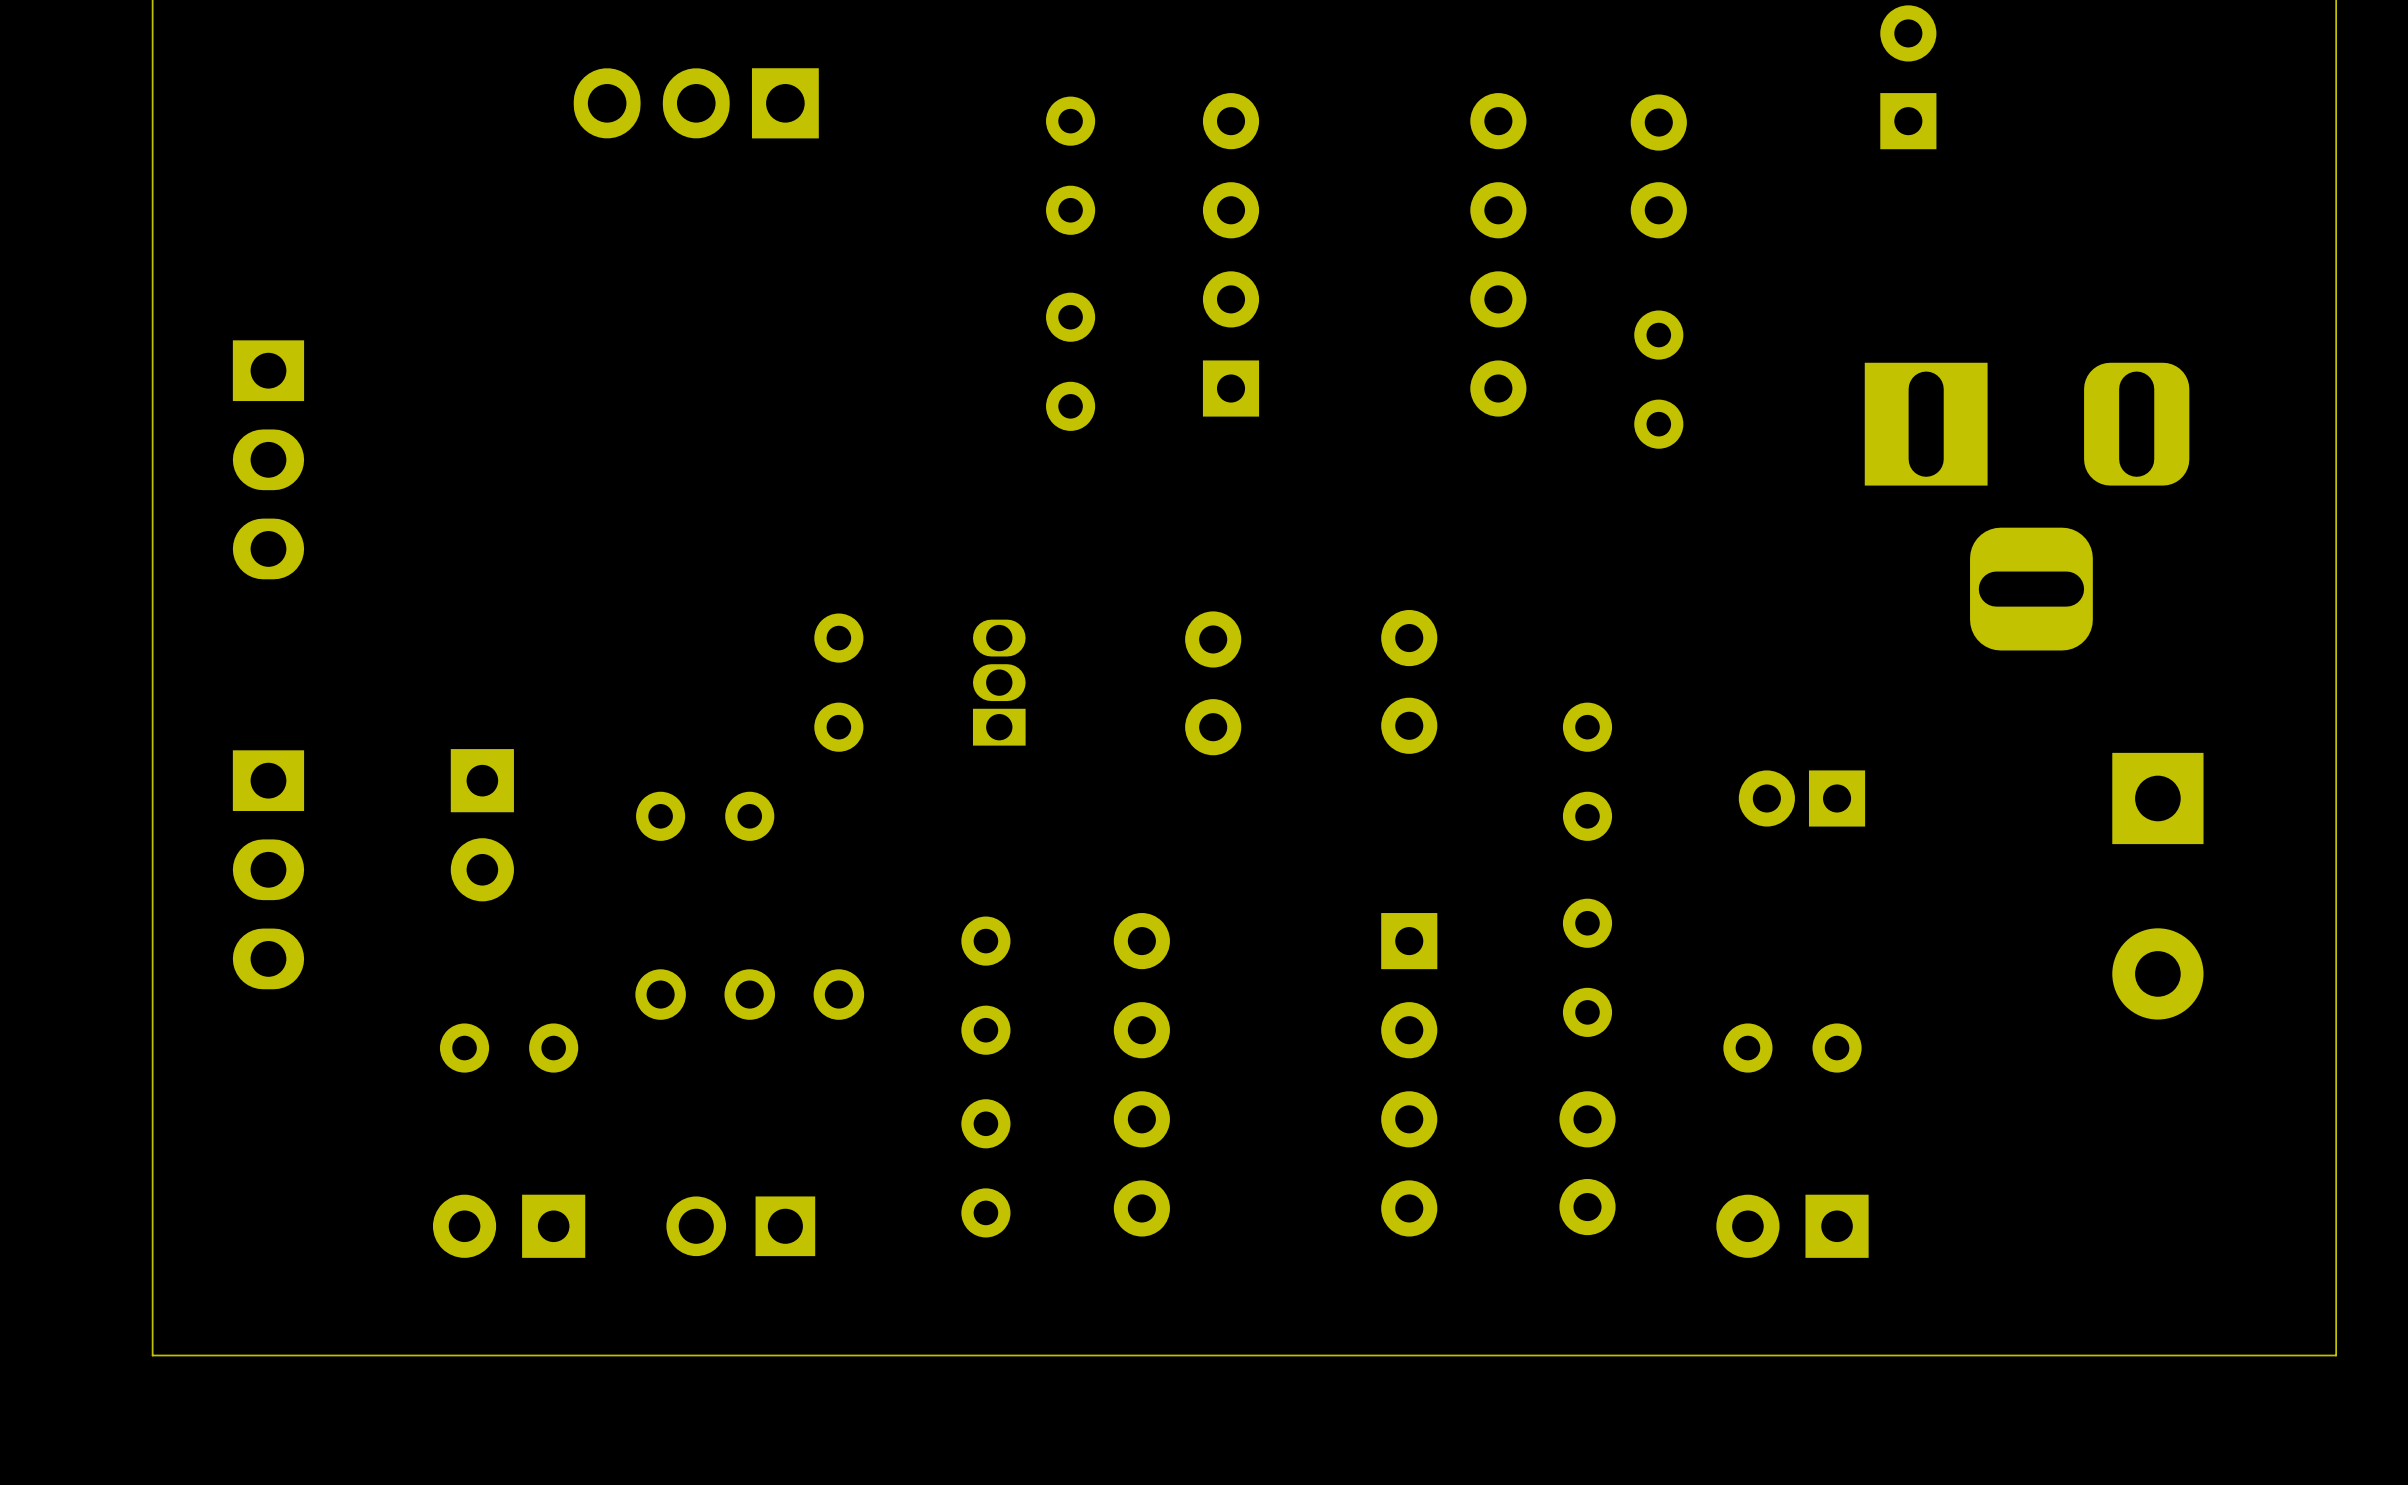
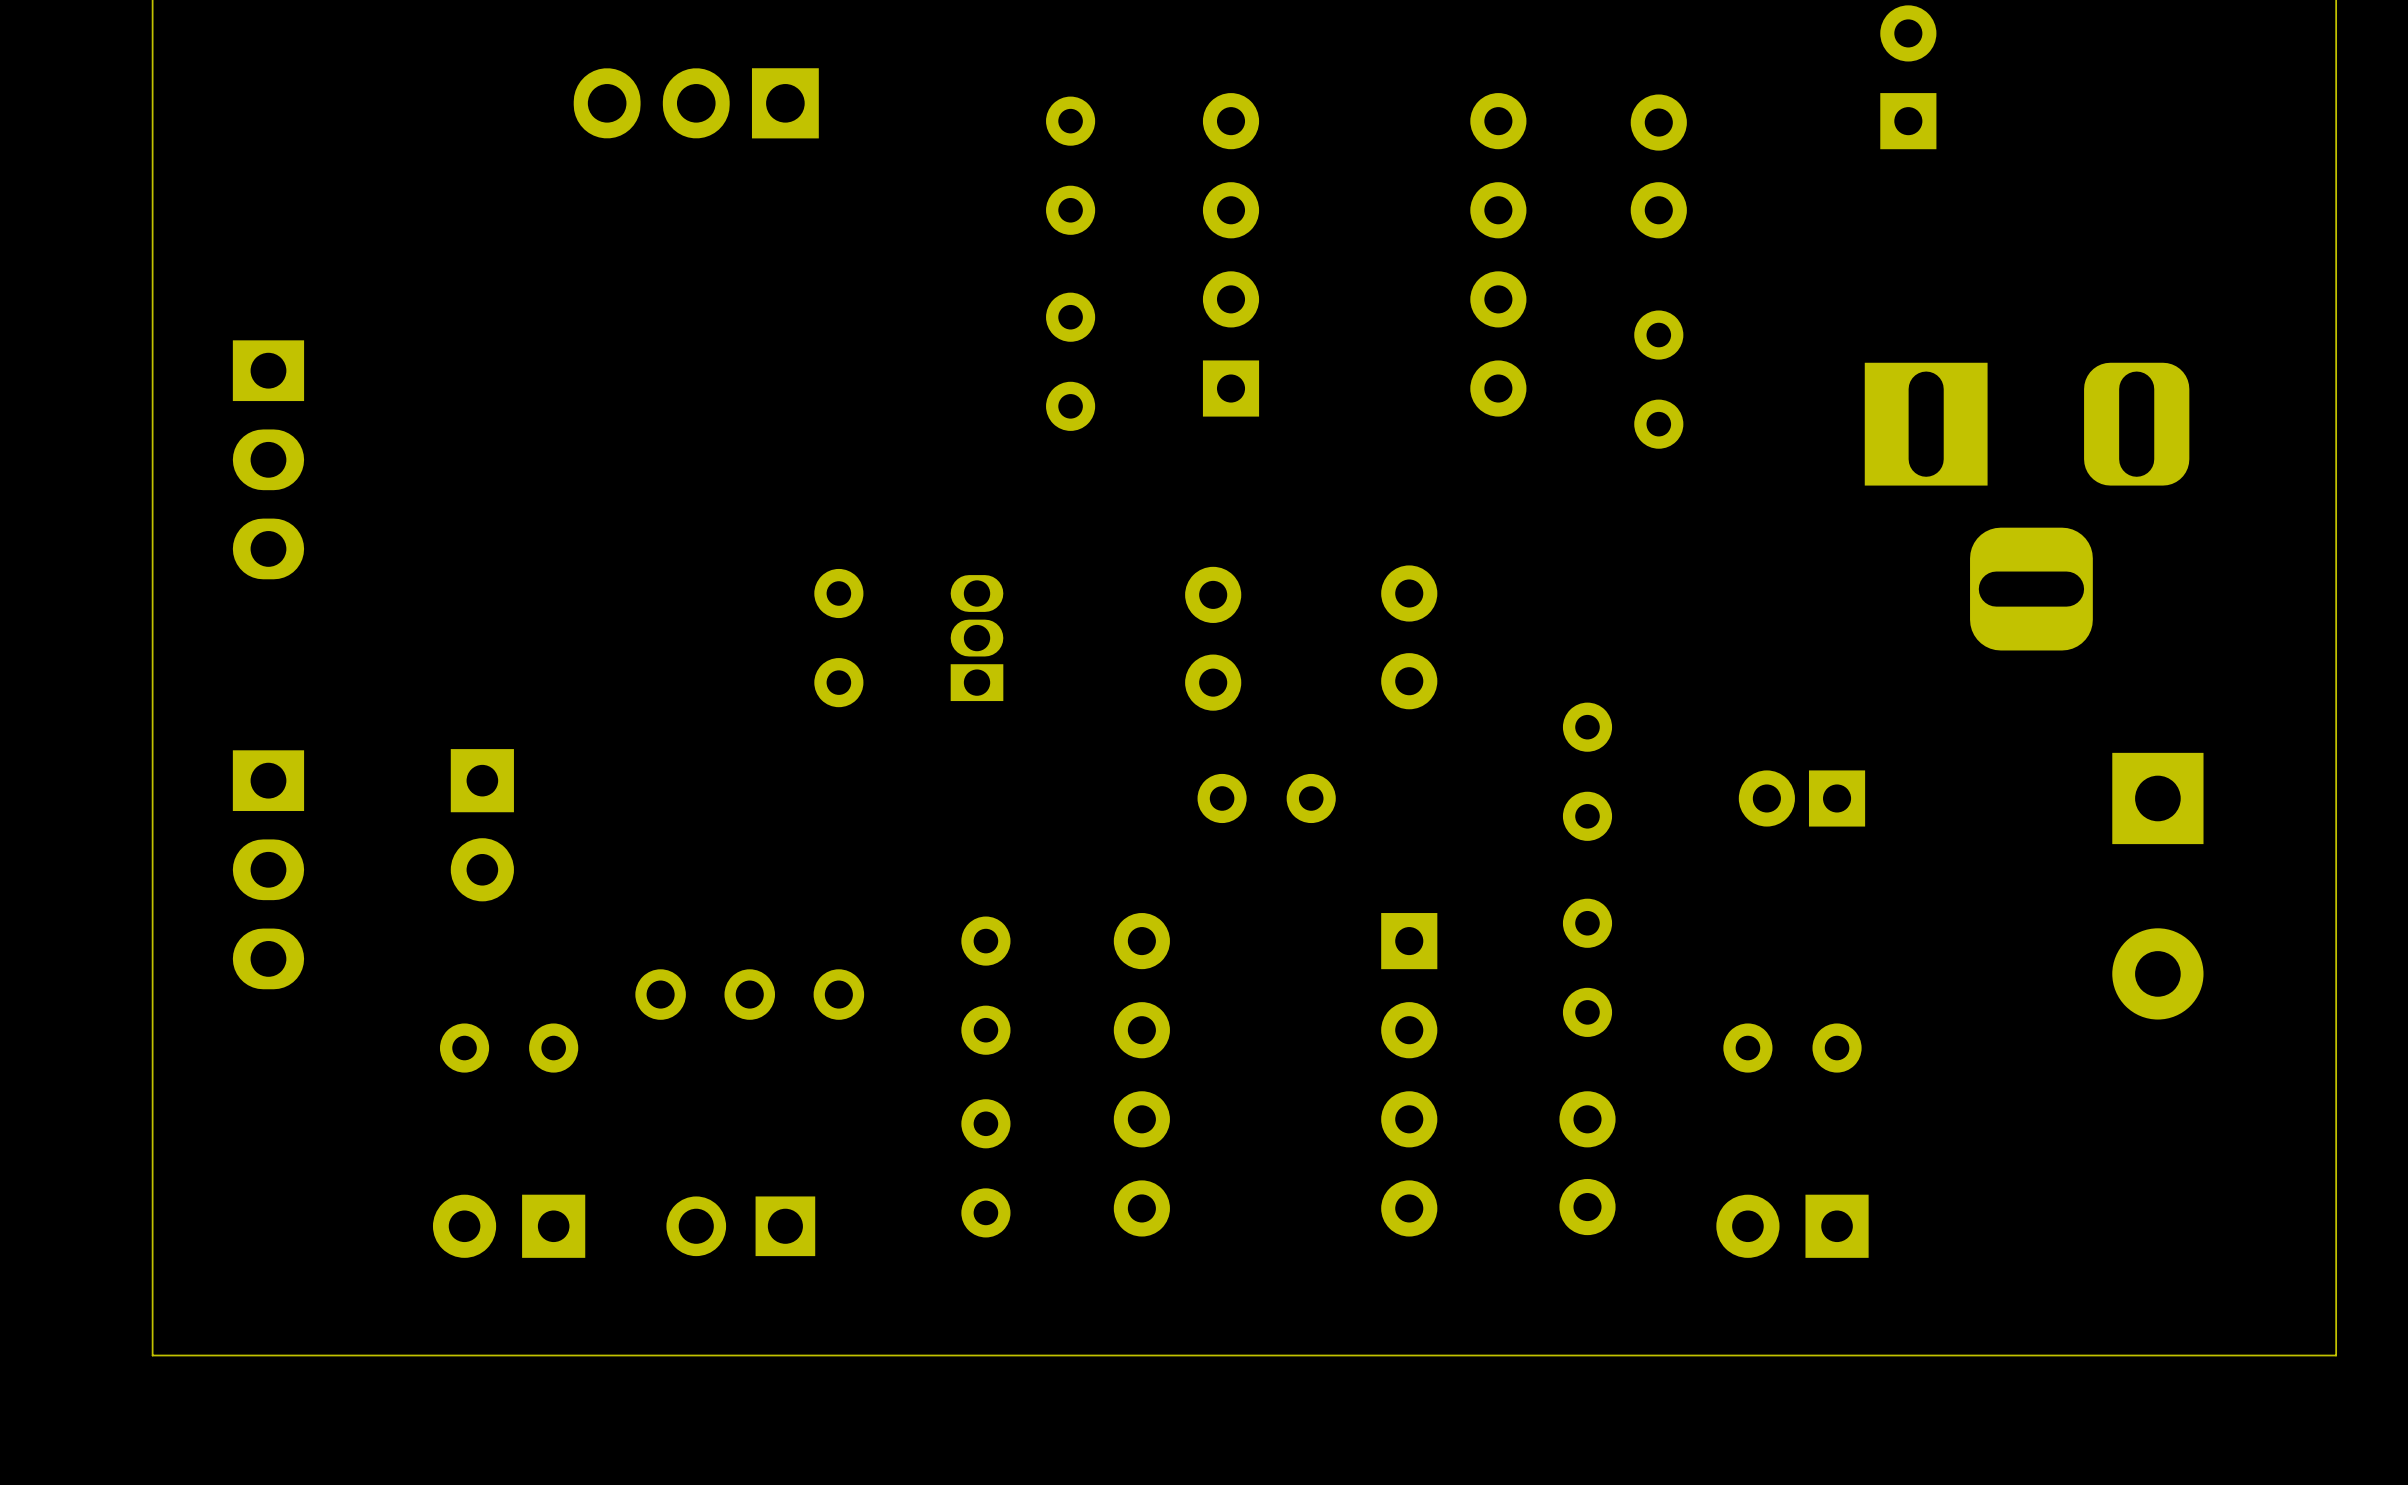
part position: (1409, 681) -> (1409, 637)
part position: (838, 682) -> (838, 638)
part position: (999, 682) -> (977, 638)
part position: (1213, 683) -> (1213, 638)
part: none -> (1266, 798)
part: (705, 816) -> none

